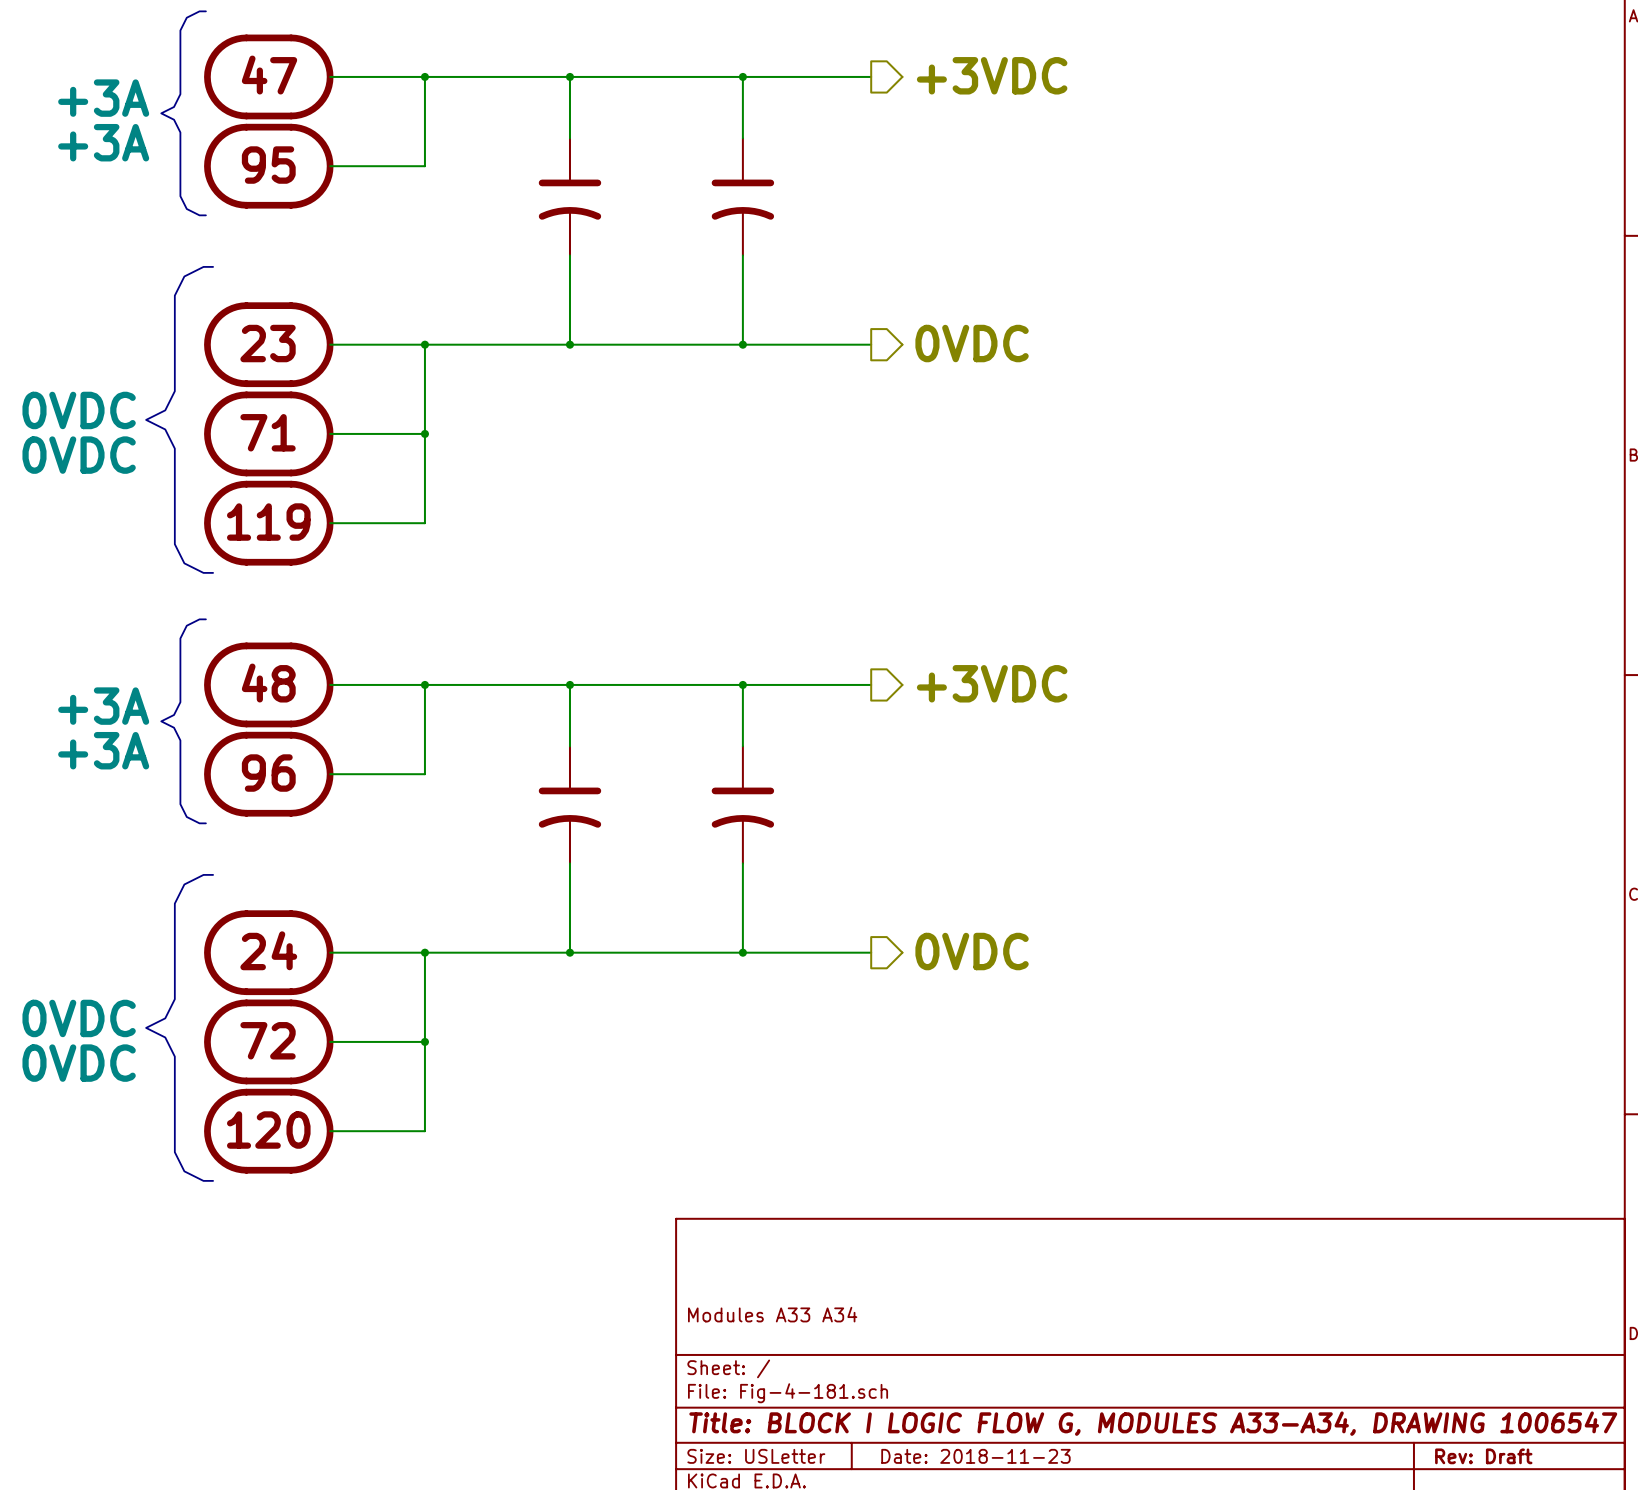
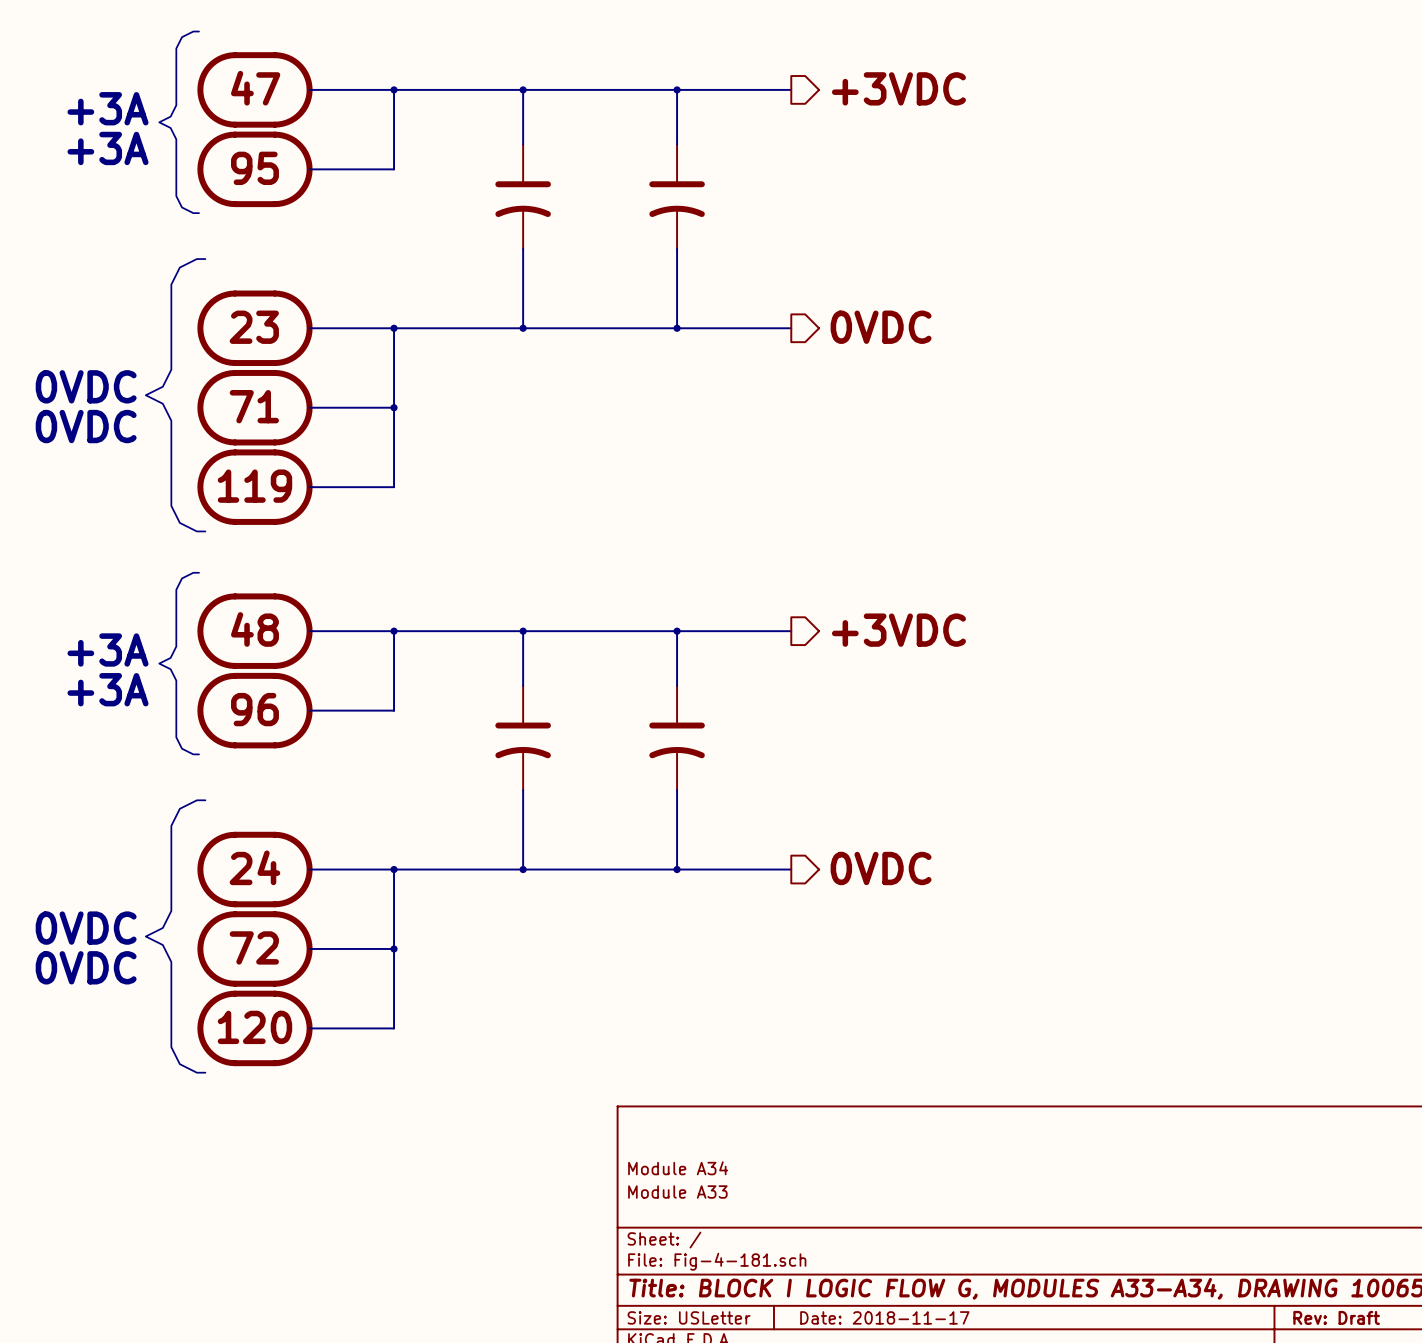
title block: none -> Module A34 (678, 1168)
title block: Modules A33 A34 (772, 1314) -> Module A33 (677, 1192)
title block: Date: 2018-11-23 (975, 1456) -> Date: 2018-11-17 (884, 1317)

